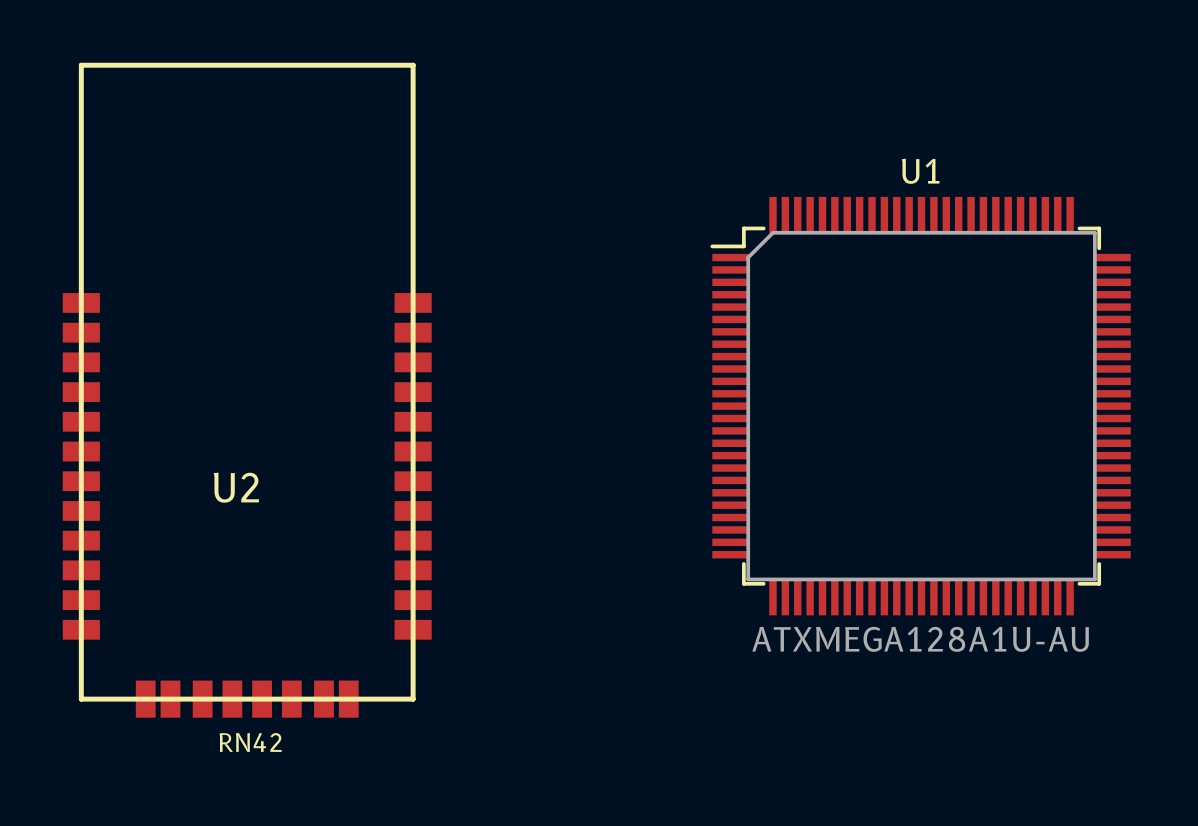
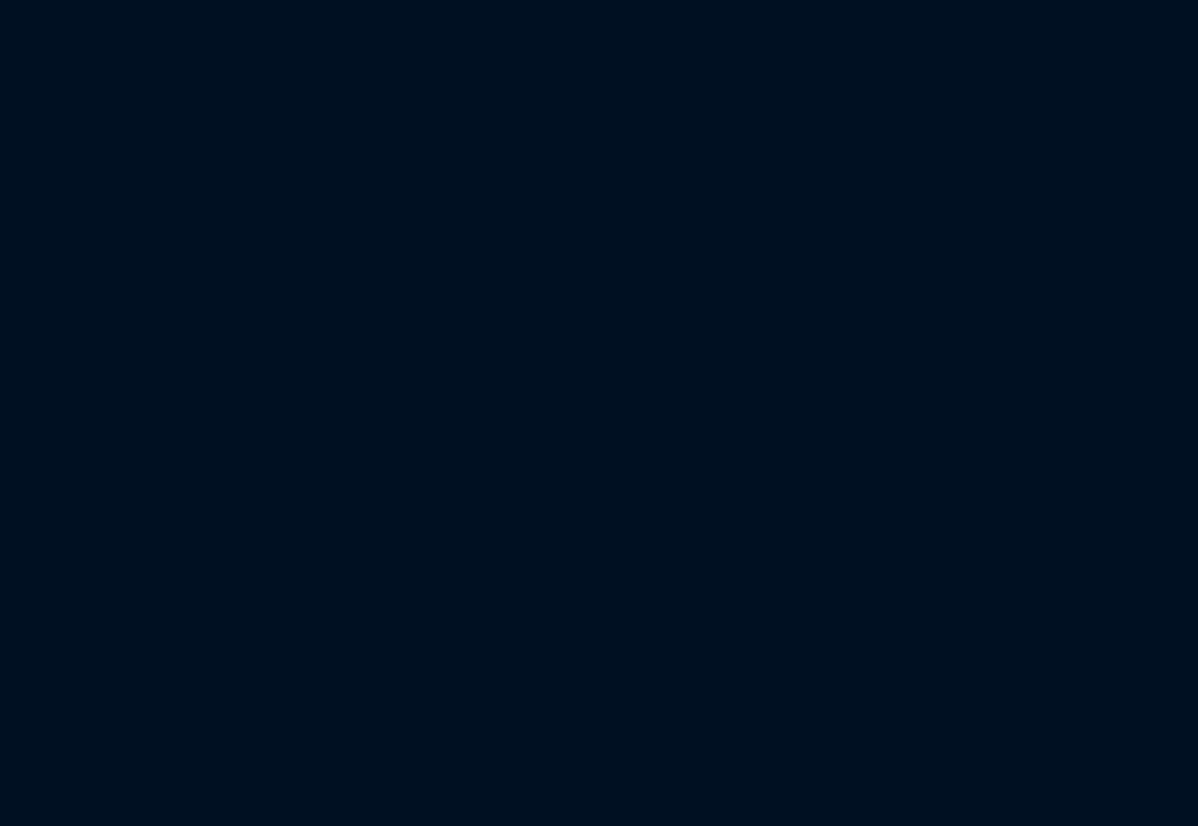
U2: RN42 (247, 390) -> none
U1: ATXMEGA128A1U-AU (920, 406) -> none

